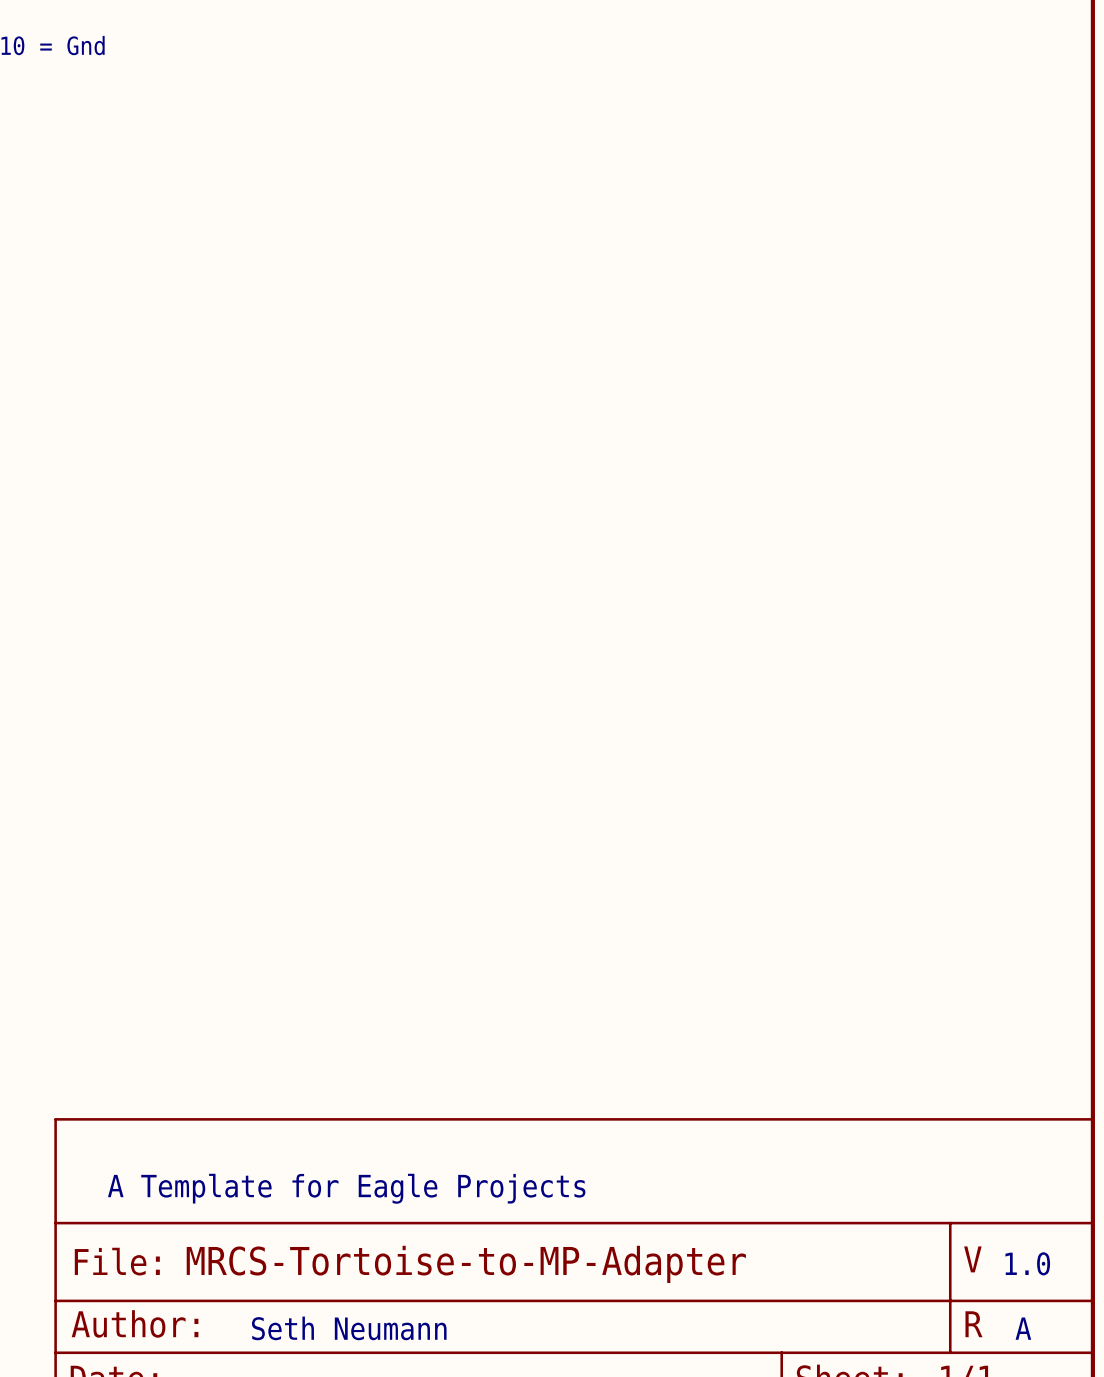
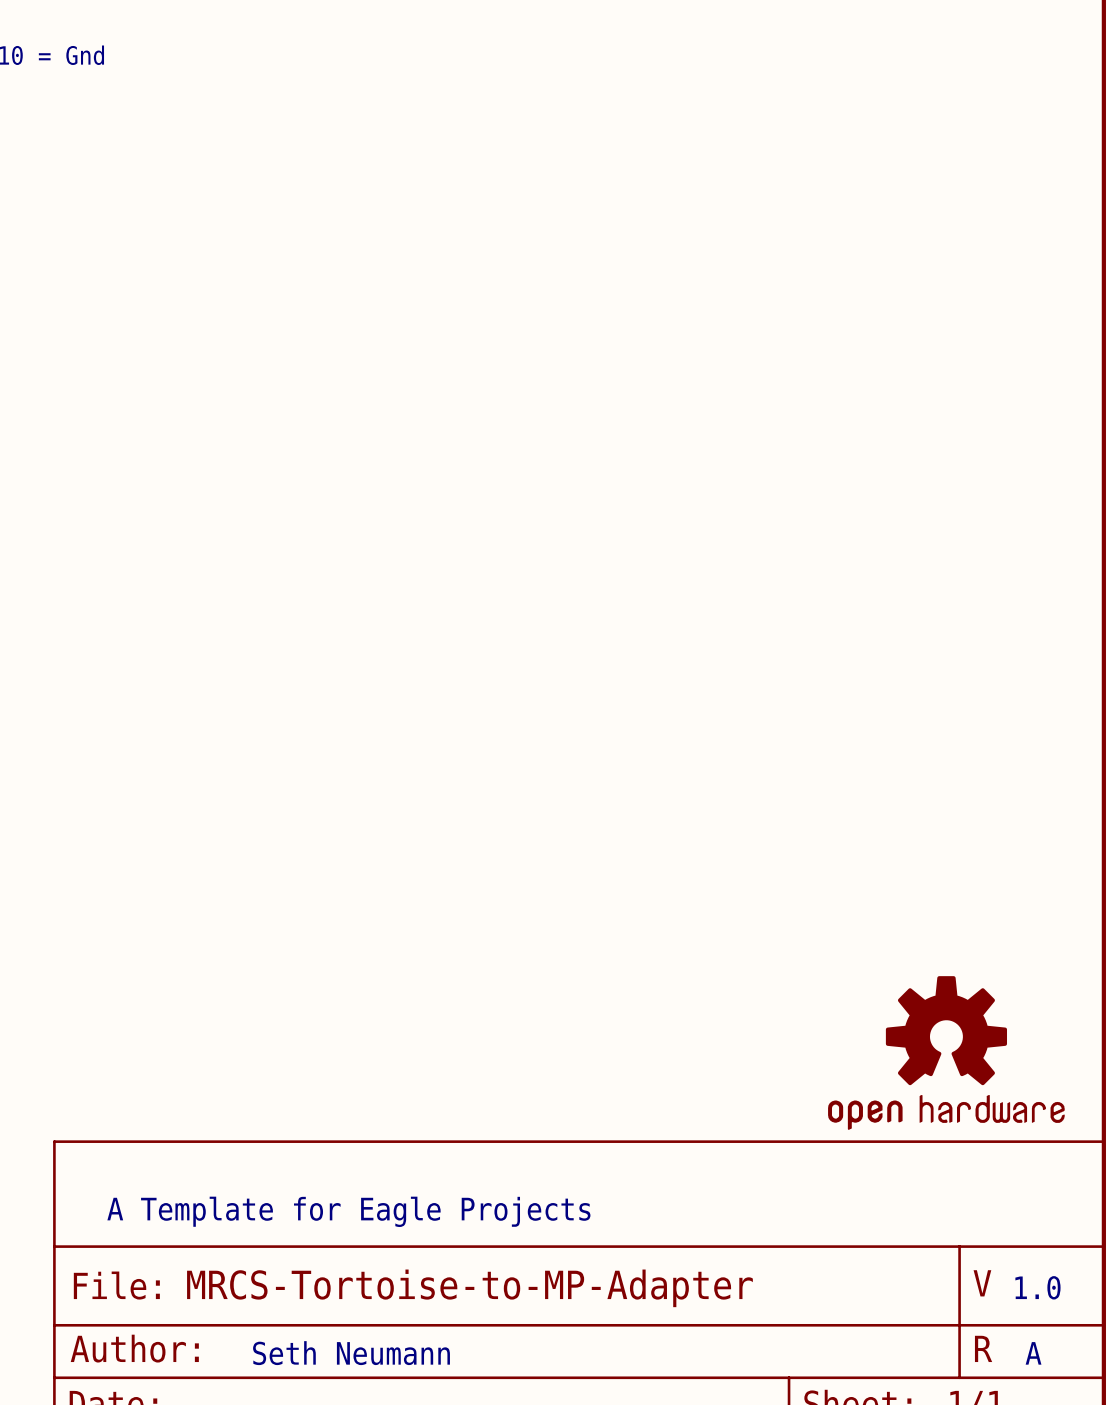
part: none -> (946, 1052)

